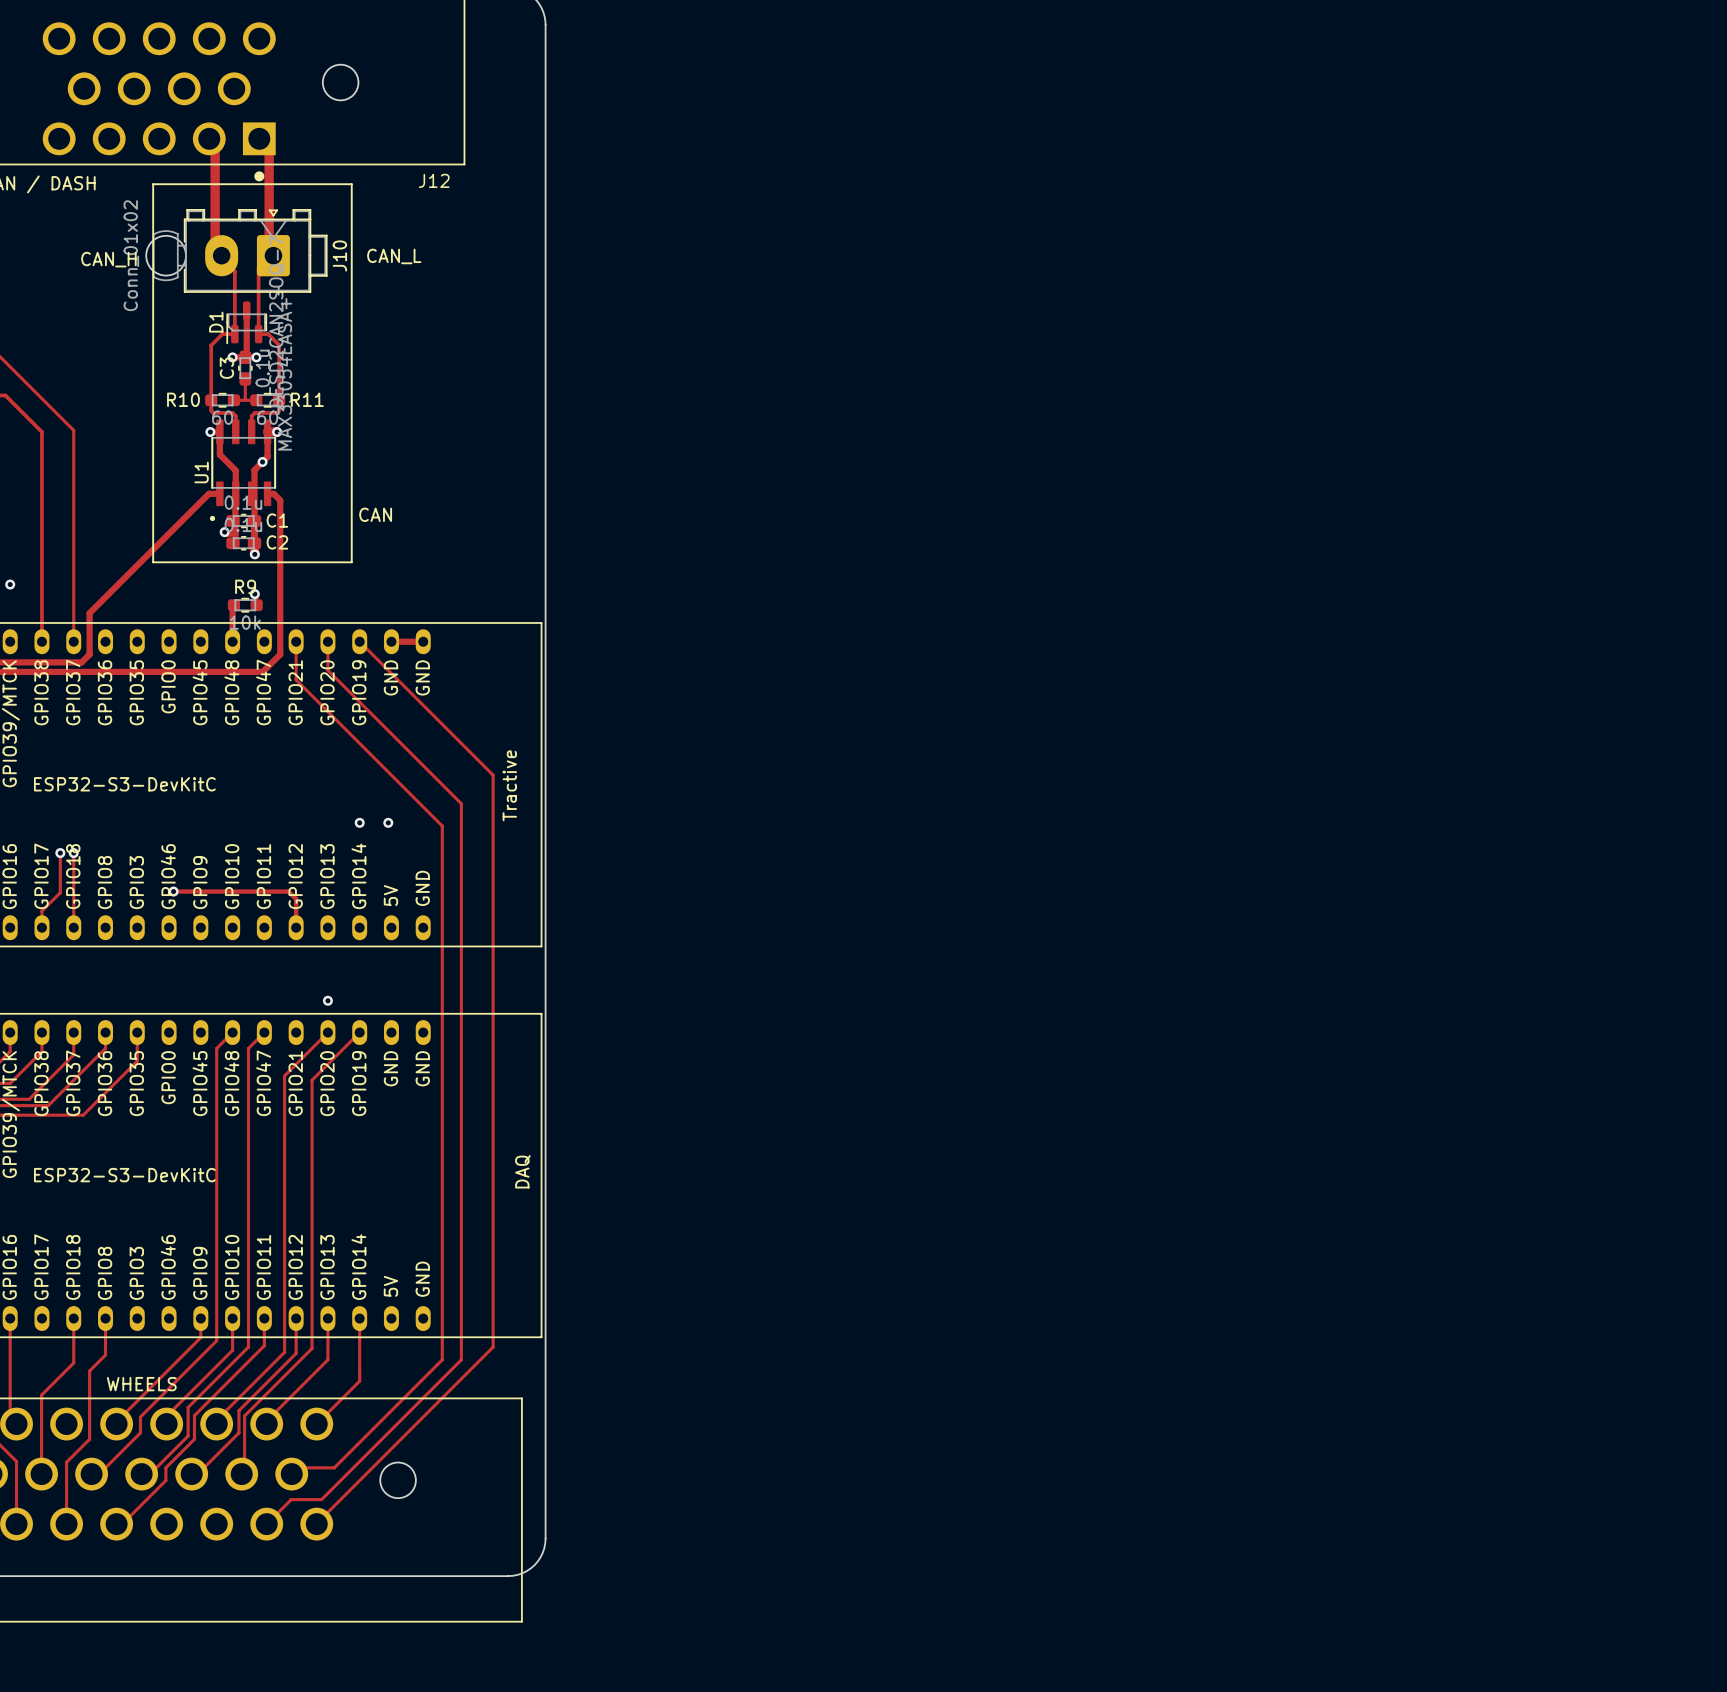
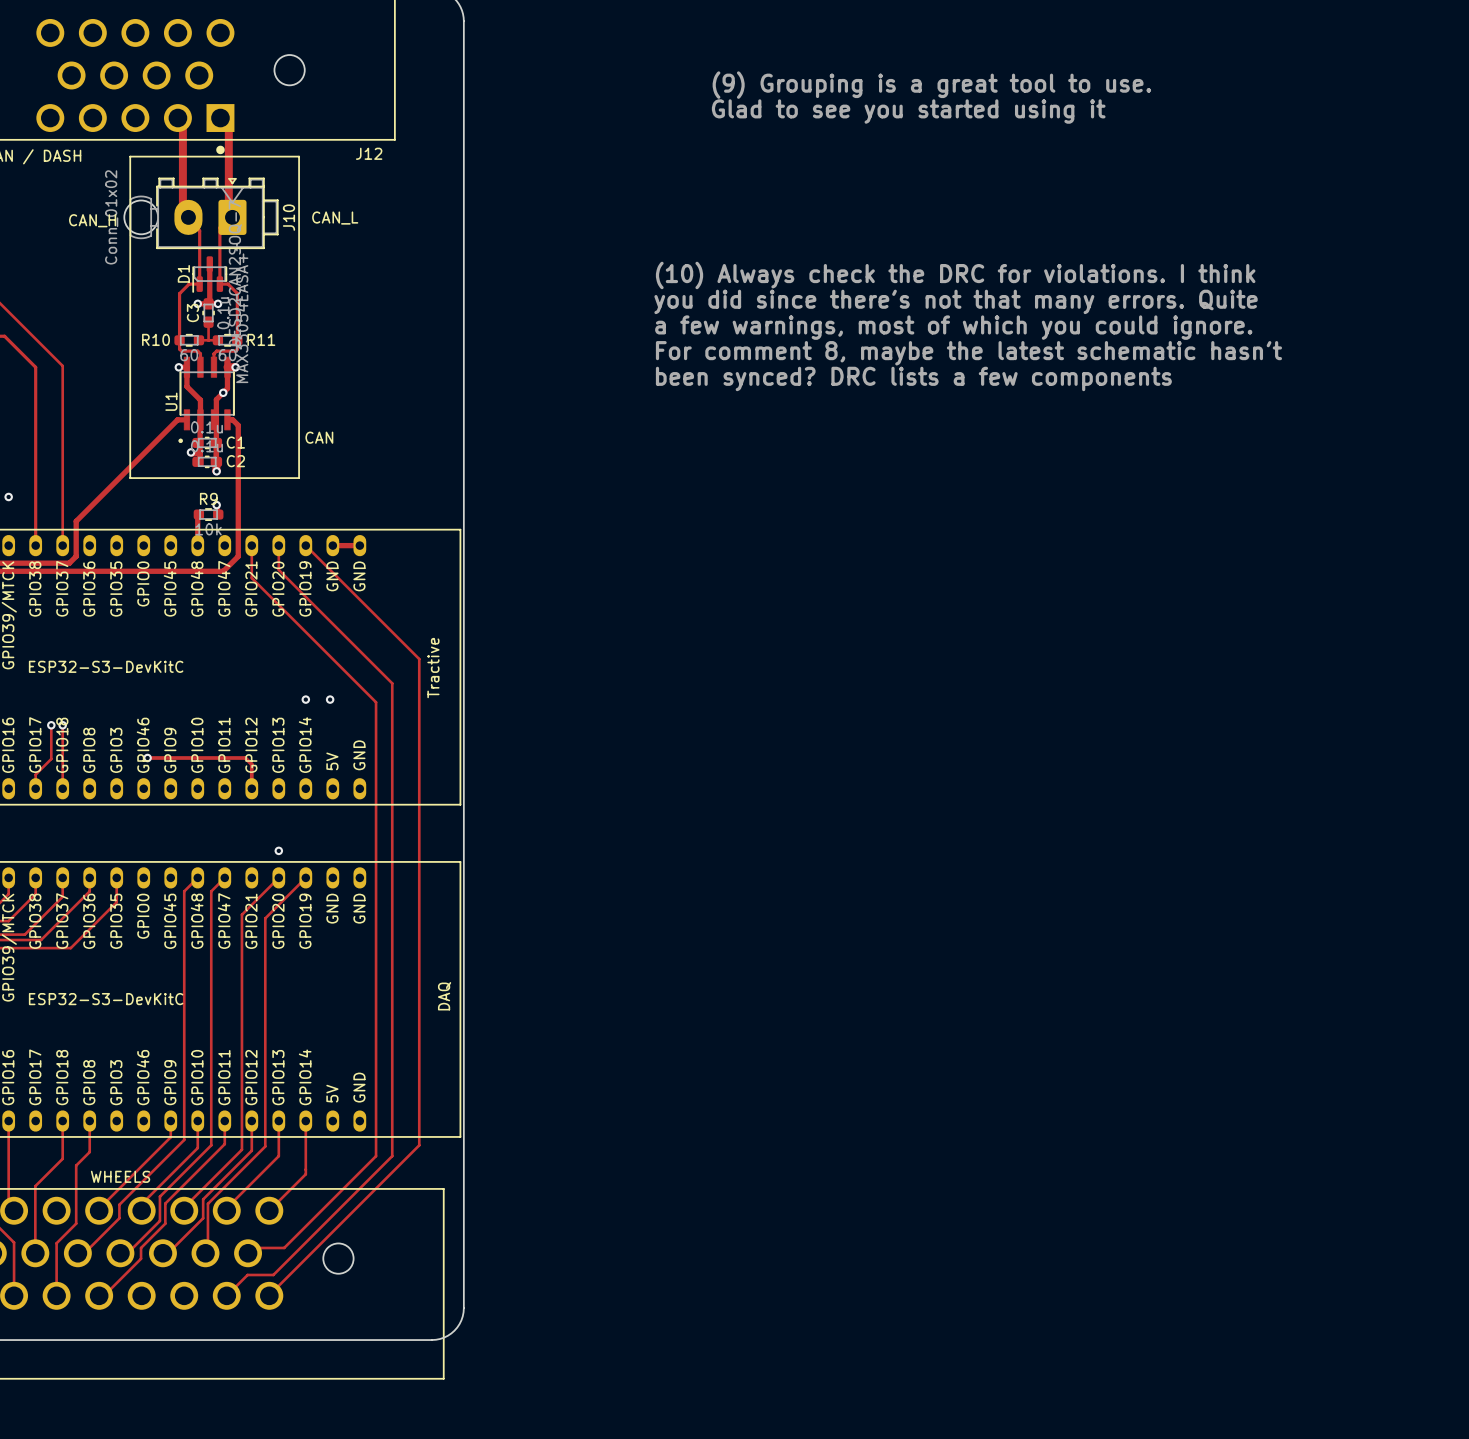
text: none -> (9) Grouping is a great tool to use. (931, 85)
text: none -> Glad to see you started using it (908, 111)
text: none -> (10) Always check the DRC for violations. I think (955, 275)
text: none -> you did since there's not that many errors. Quite (956, 301)
text: none -> a few warnings, most of which you could ignore. (953, 327)
text: none -> For comment 8, maybe the latest schematic hasn't (968, 353)
text: none -> been synced? DRC lists a few components (913, 378)

